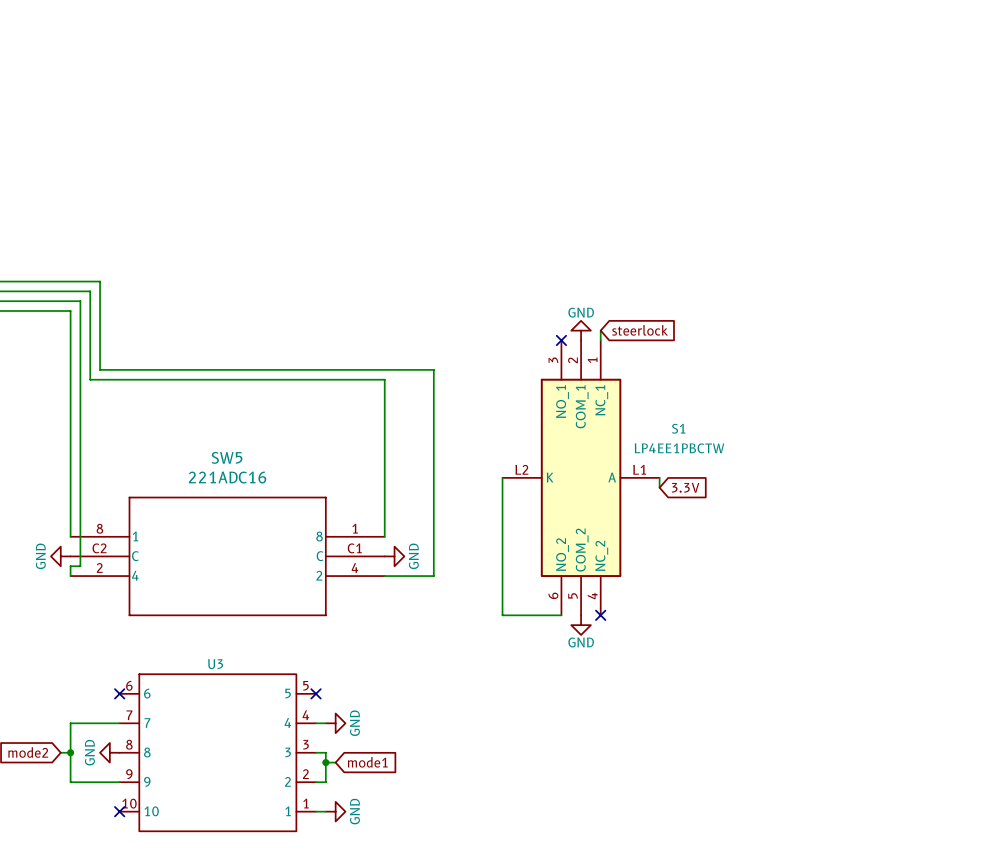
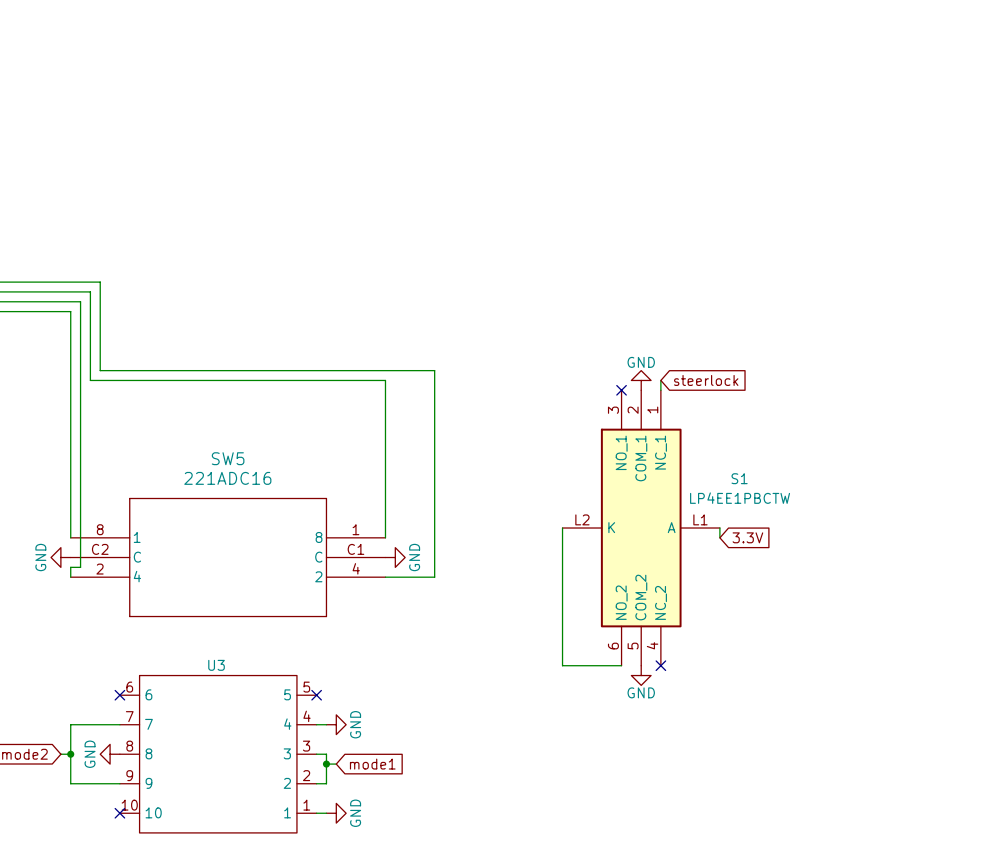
power symbol position: GND (581, 330) -> GND (641, 380)
wire: (600, 330) (600, 340) -> (660, 380) (660, 390)
global label position: steerlock (640, 330) -> steerlock (706, 380)
no-connect mark: (561, 340) -> none
no-connect mark: none -> (621, 390)
wire: (502, 477) (502, 615) (561, 615) -> (562, 528) (562, 665) (621, 665)
S1 position: (581, 477) -> (641, 528)
global label position: 3.3V (685, 487) -> 3.3V (747, 537)
no-connect mark: (600, 615) -> none
power symbol position: GND (581, 625) -> GND (641, 675)
no-connect mark: none -> (660, 665)

